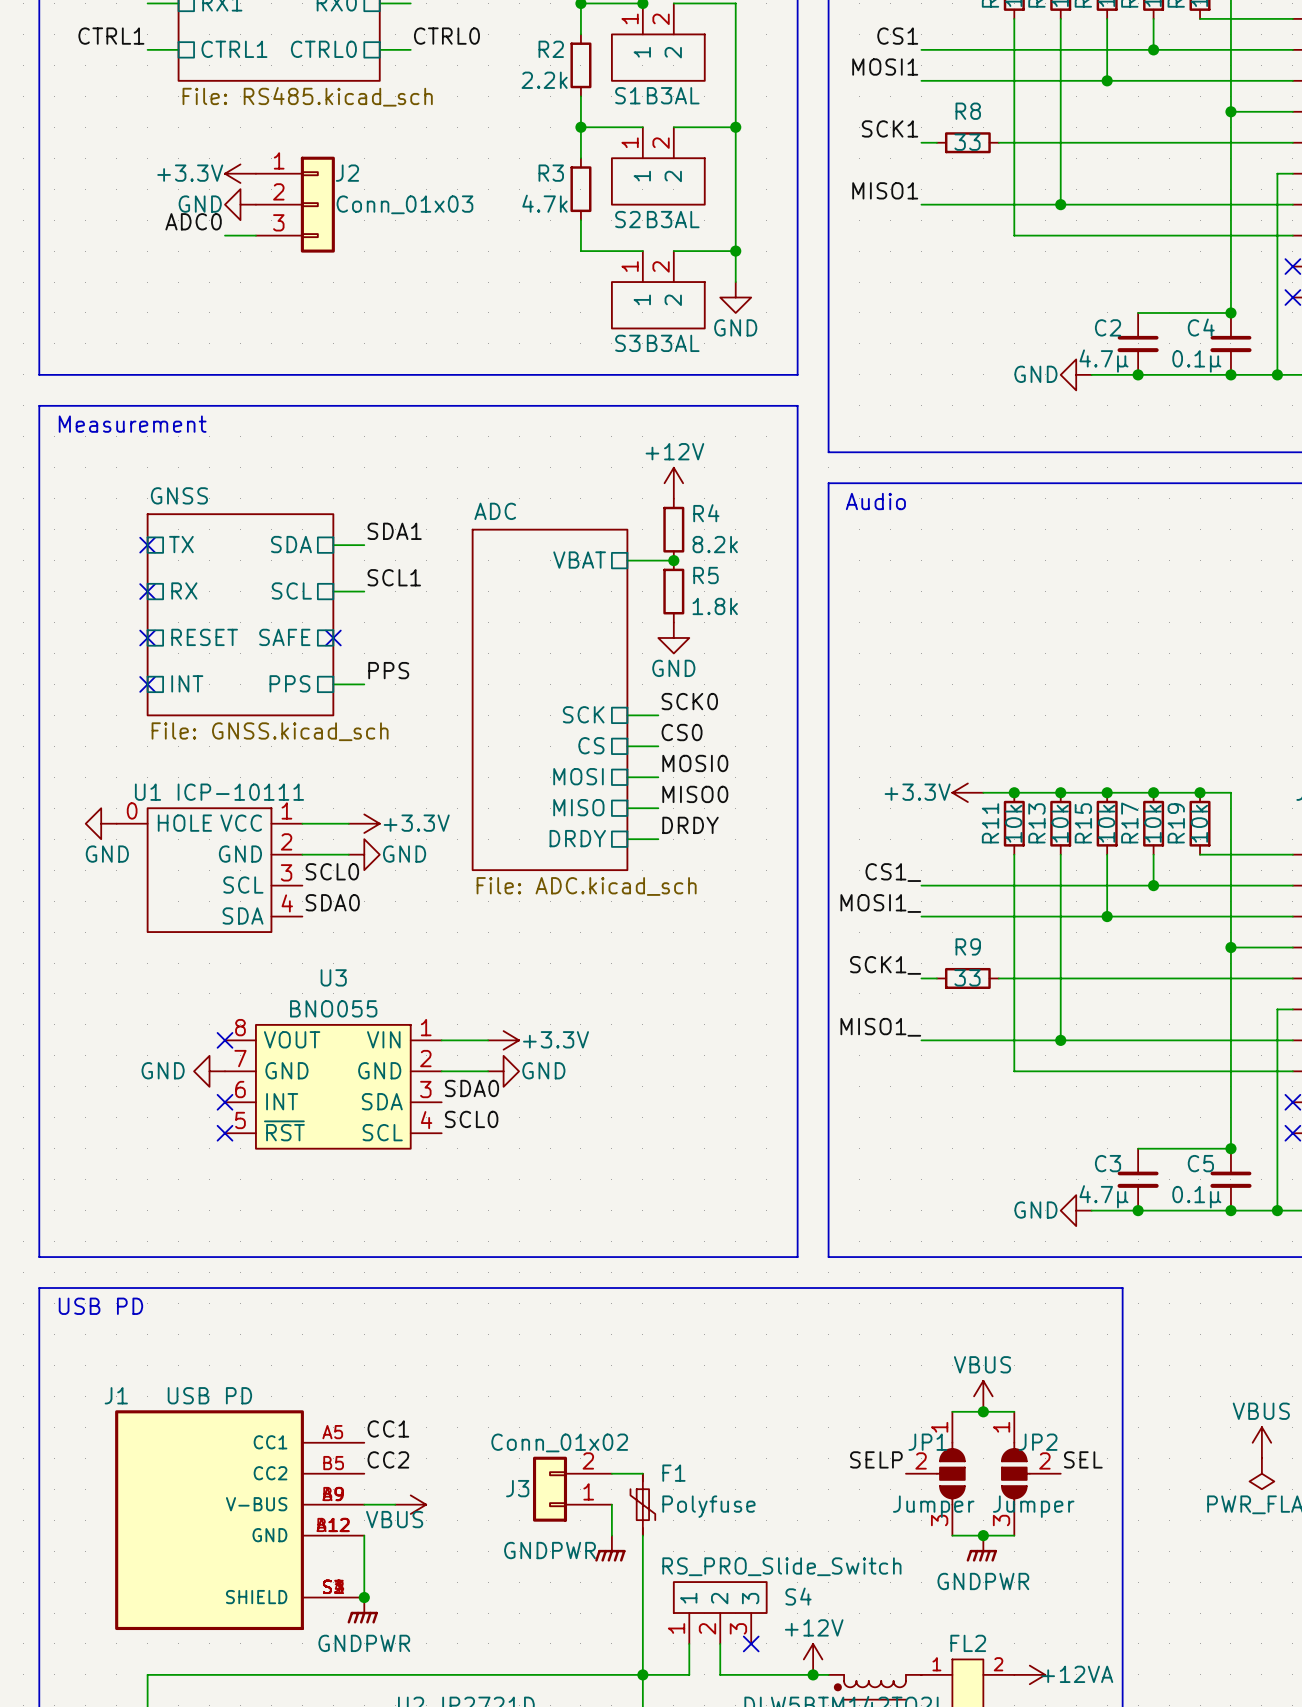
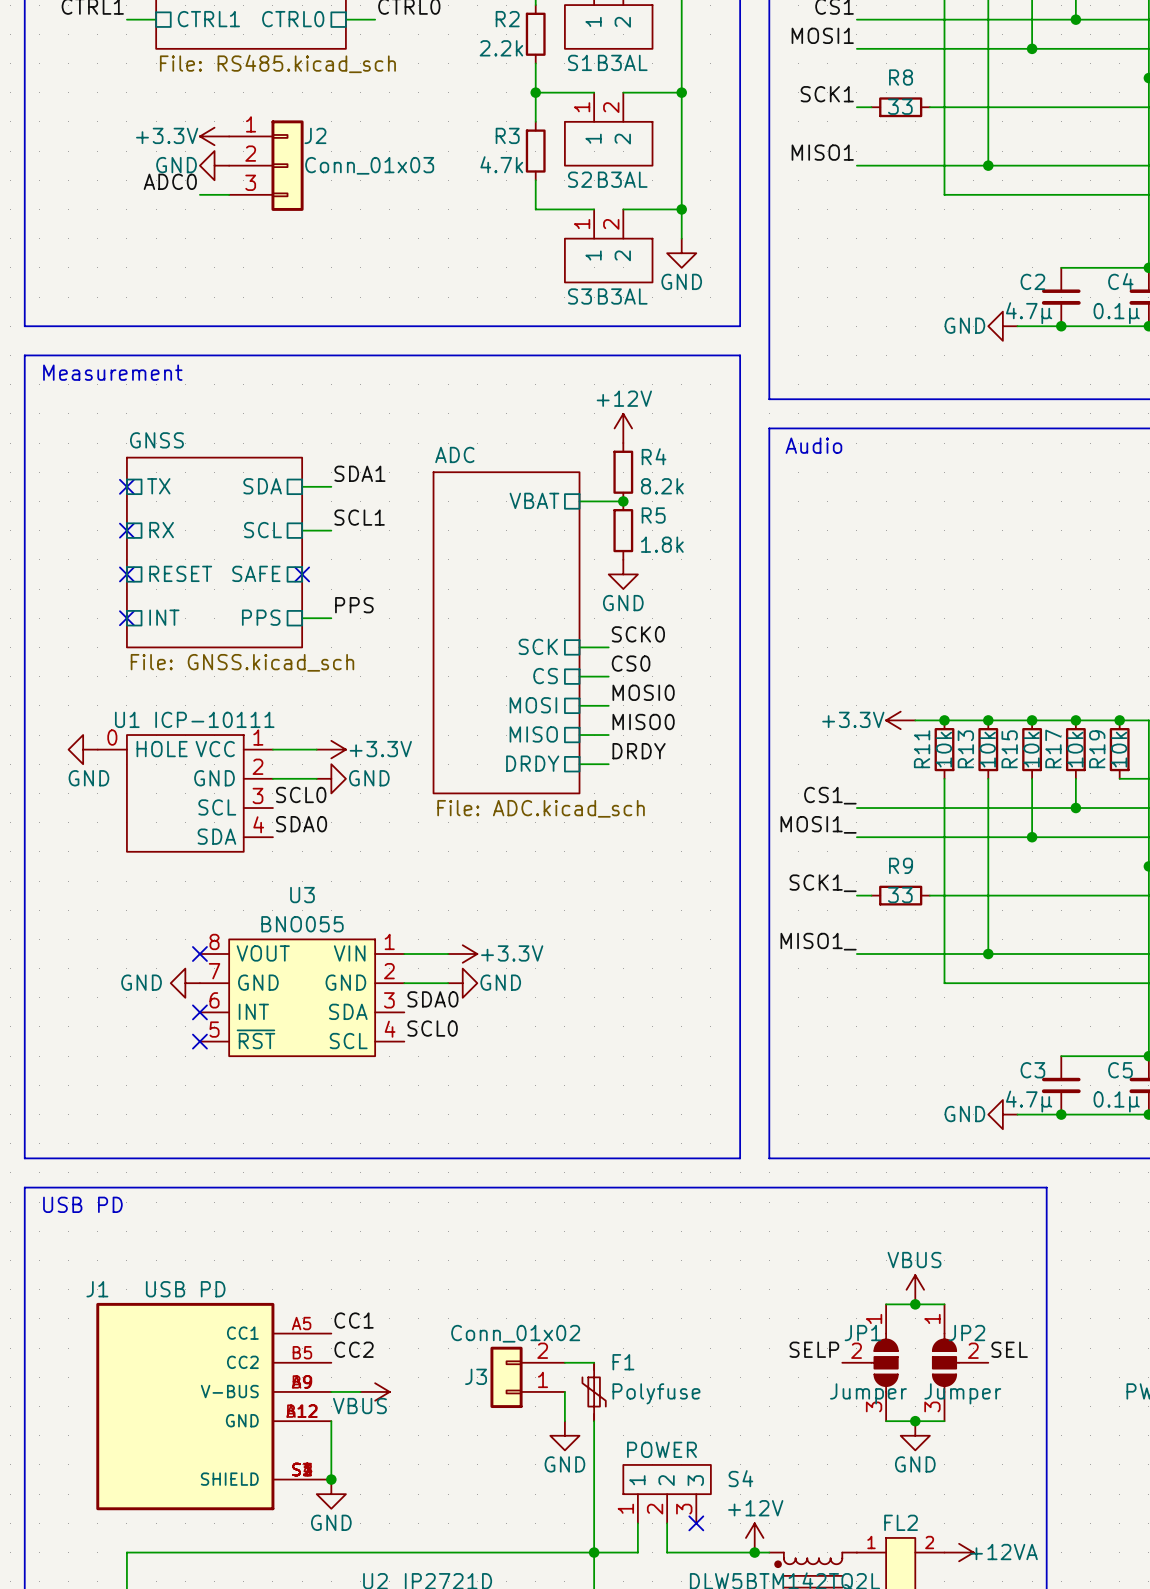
power symbol: GNDPWR (610, 1548) -> GND (564, 1435)
power symbol: GNDPWR (981, 1548) -> GND (915, 1435)
S4 value: RS_PRO_Slide_Switch (781, 1566) -> POWER (662, 1449)
power symbol: GNDPWR (362, 1610) -> GND (331, 1494)

